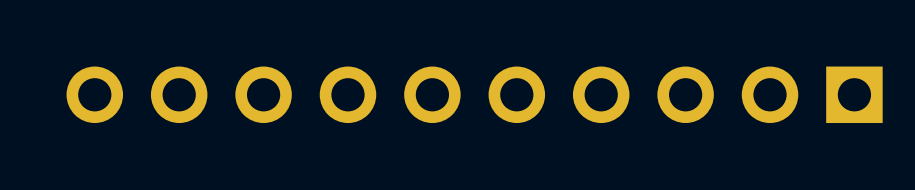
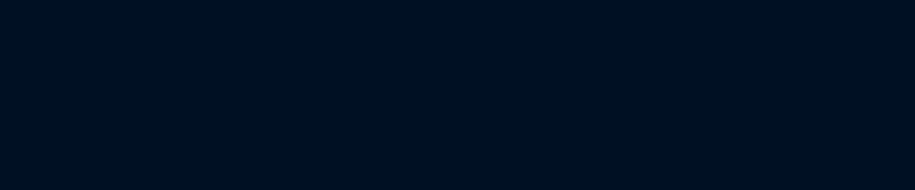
part: (474, 94) -> none

